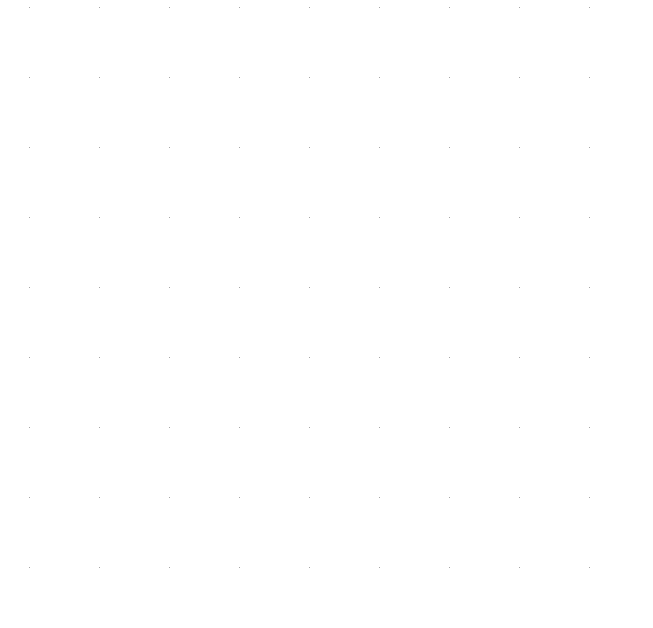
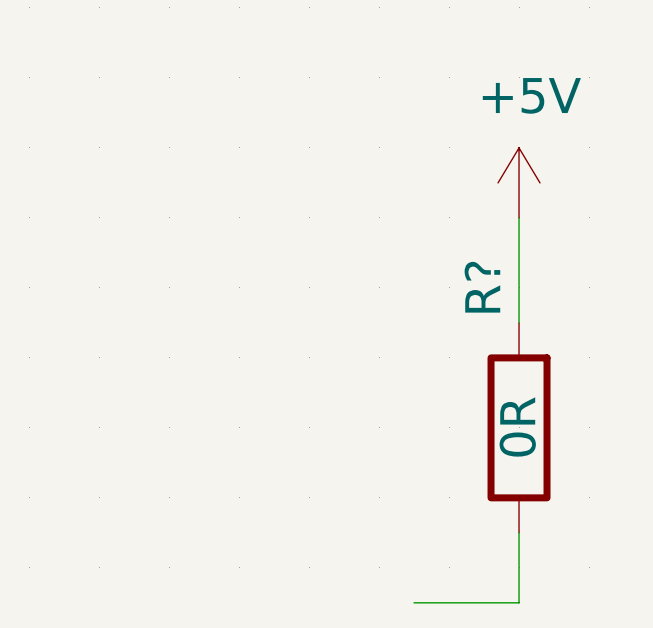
power symbol: none -> +5V (519, 182)
wire: none -> (519, 217) (519, 322)
R?: none -> 0R (519, 427)
wire: none -> (519, 532) (519, 602) (414, 602)

